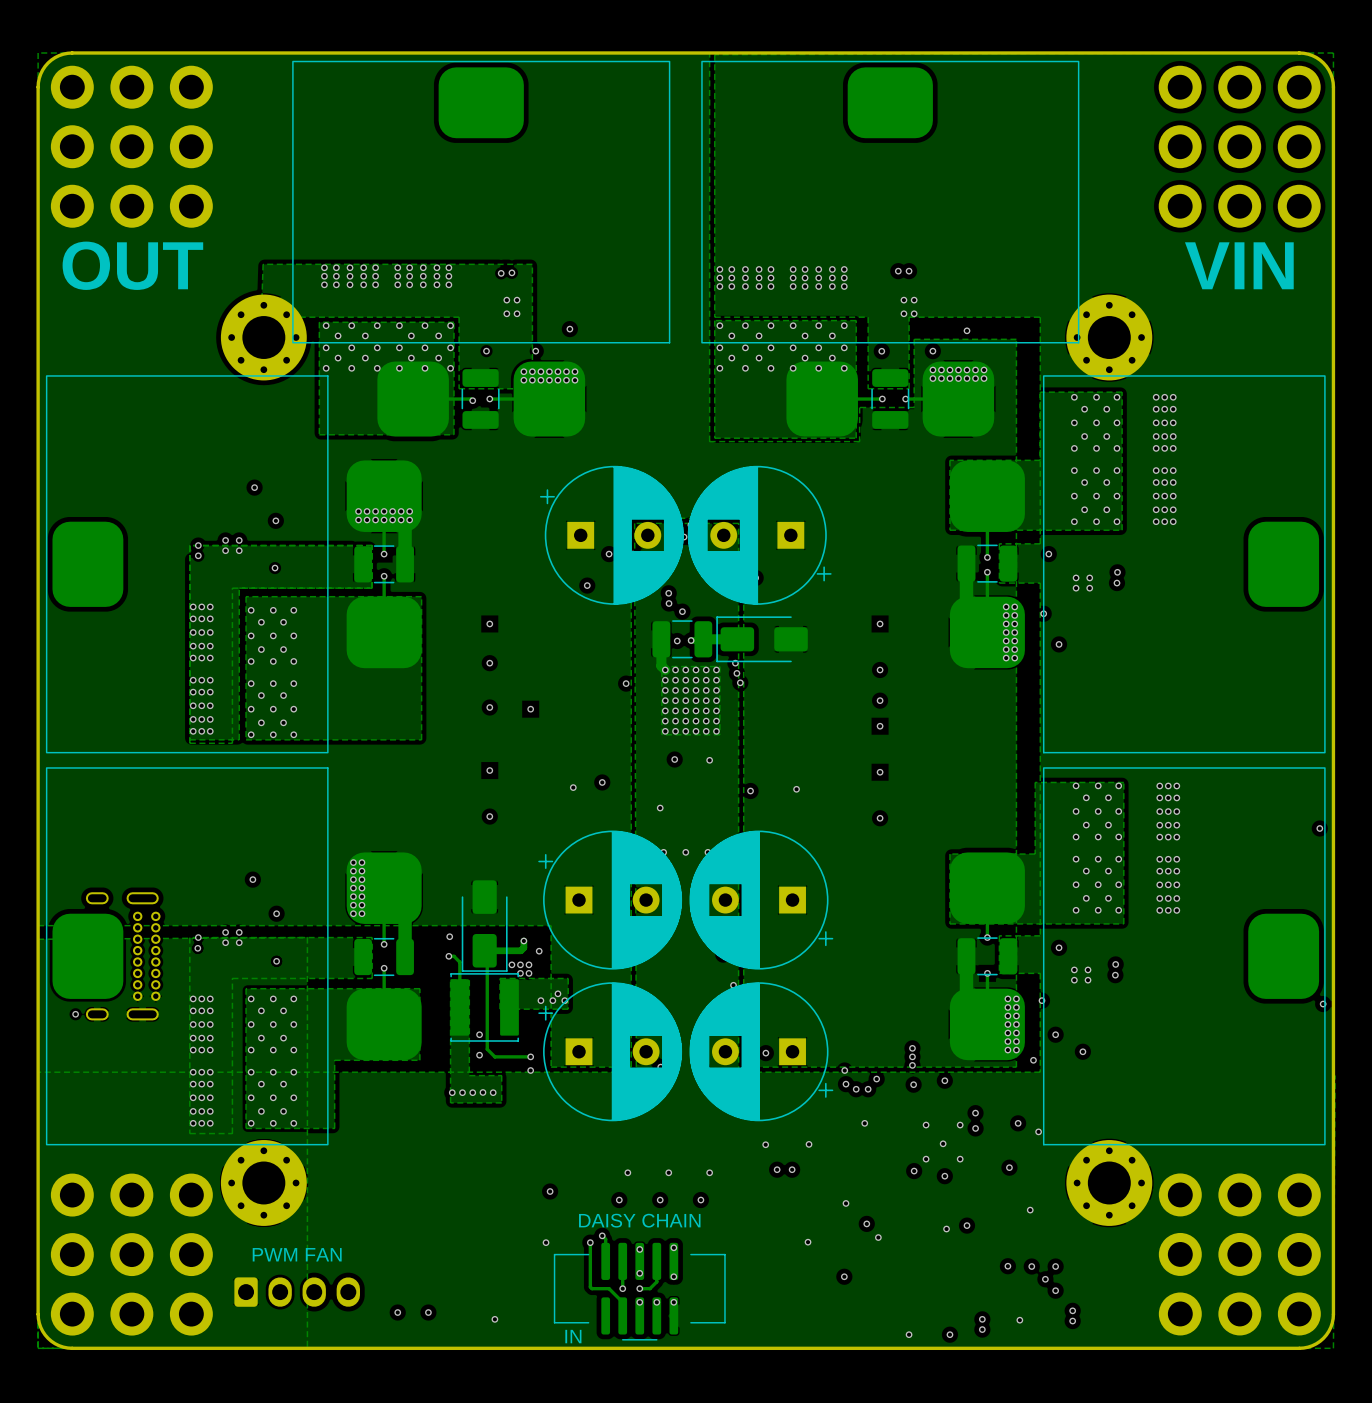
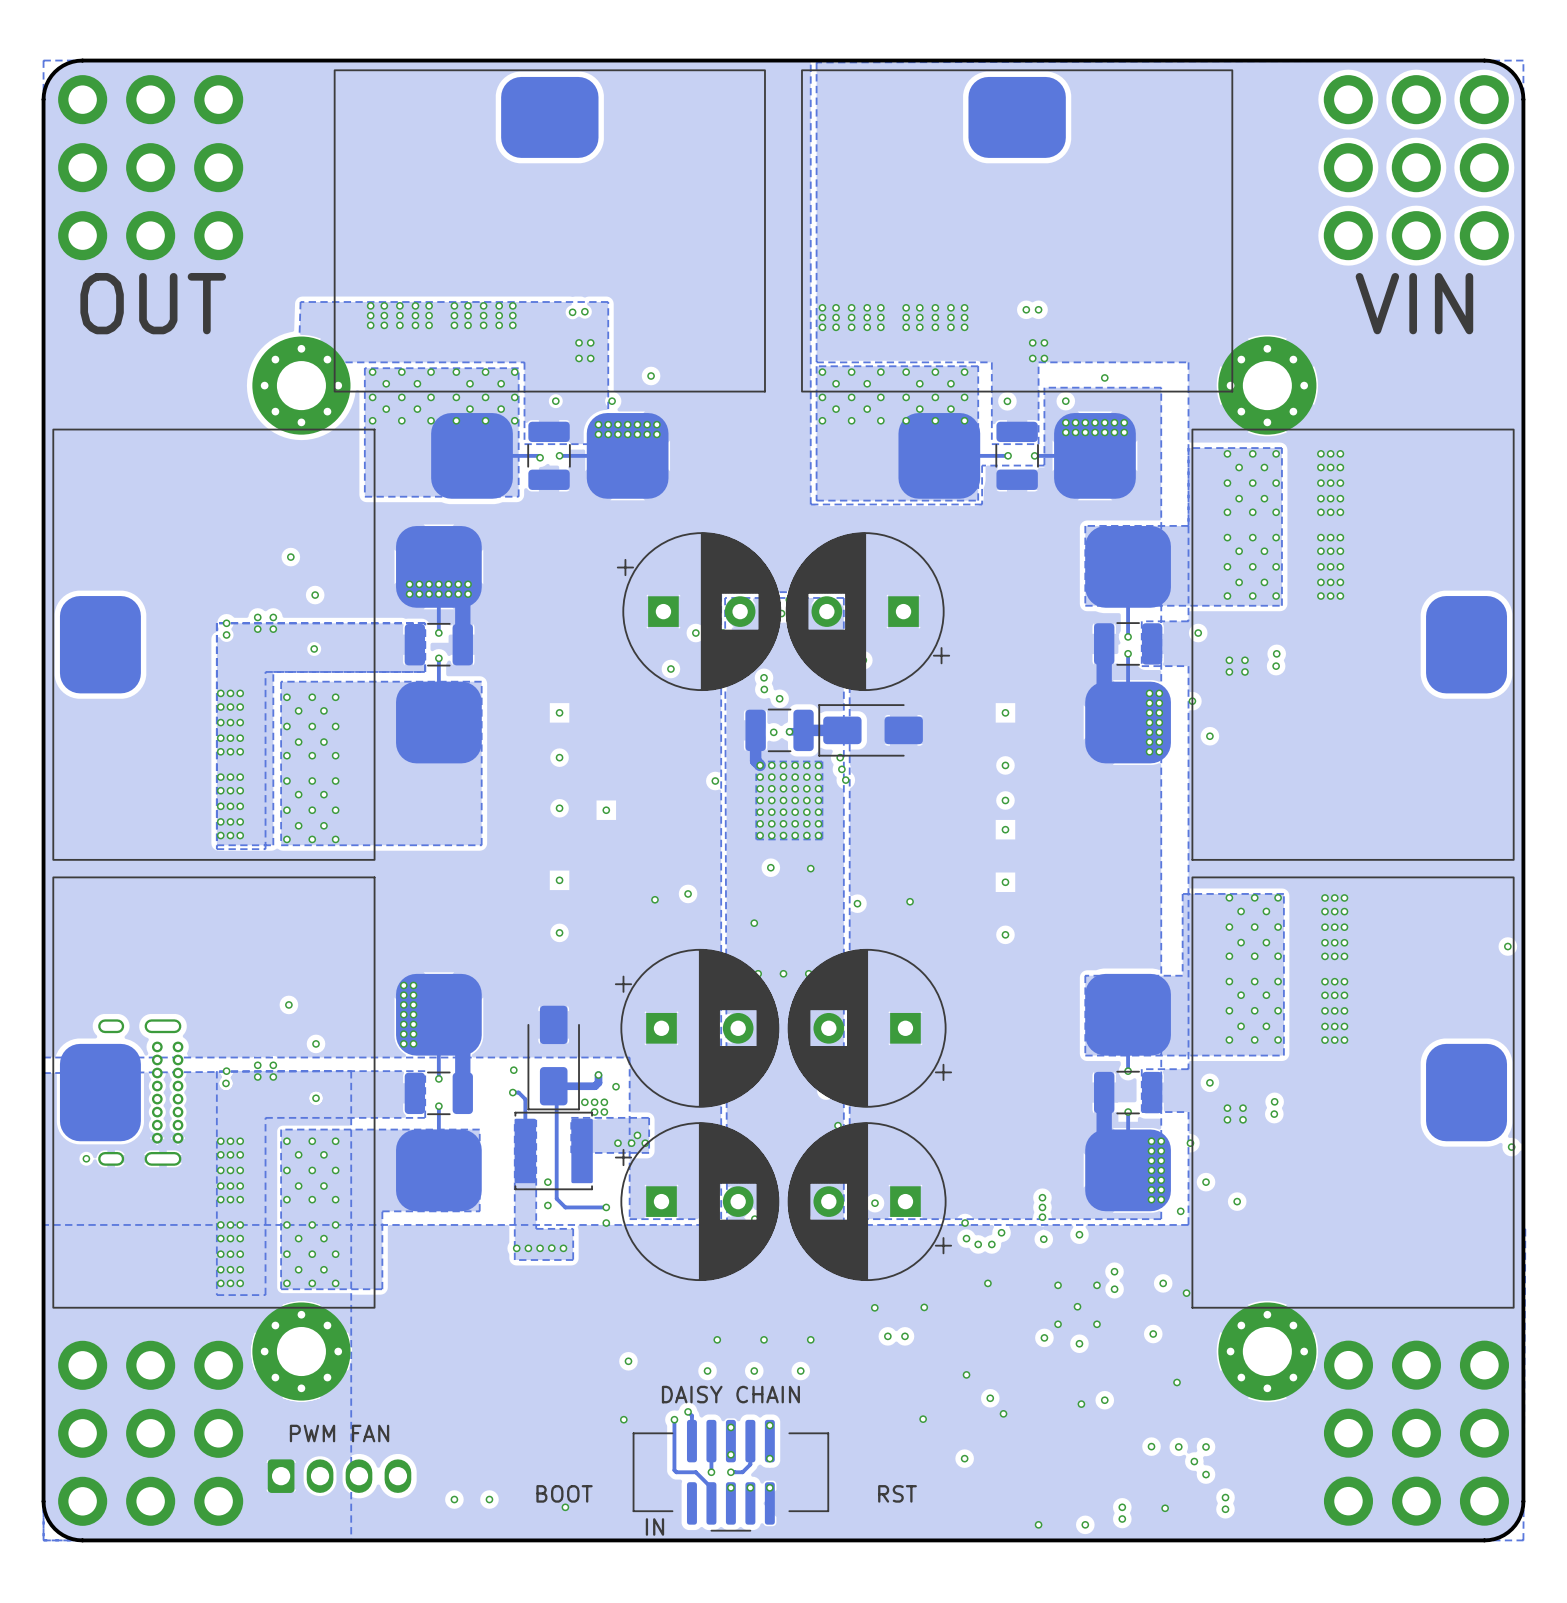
text: none -> BOOT (564, 1493)
text: none -> RST (897, 1493)

